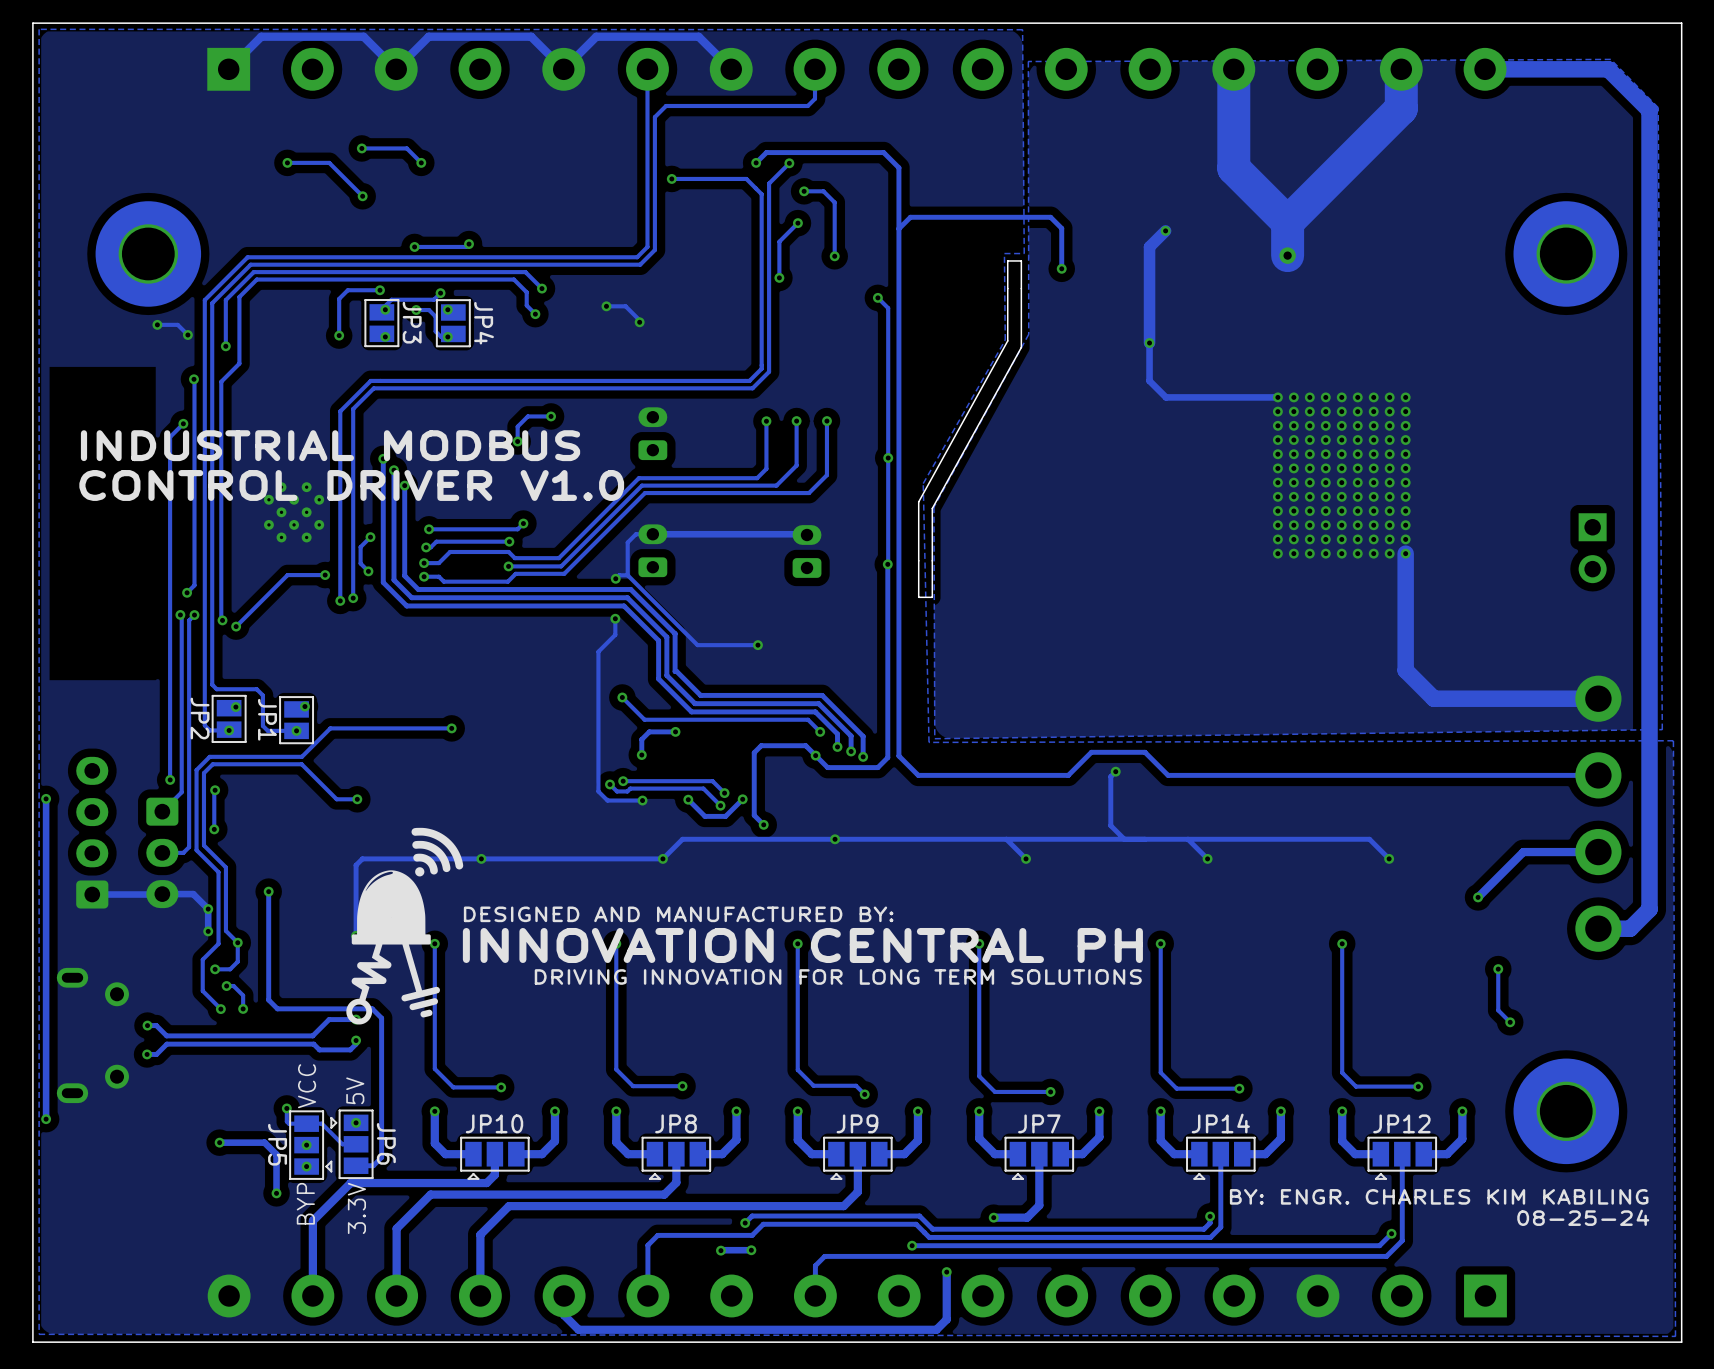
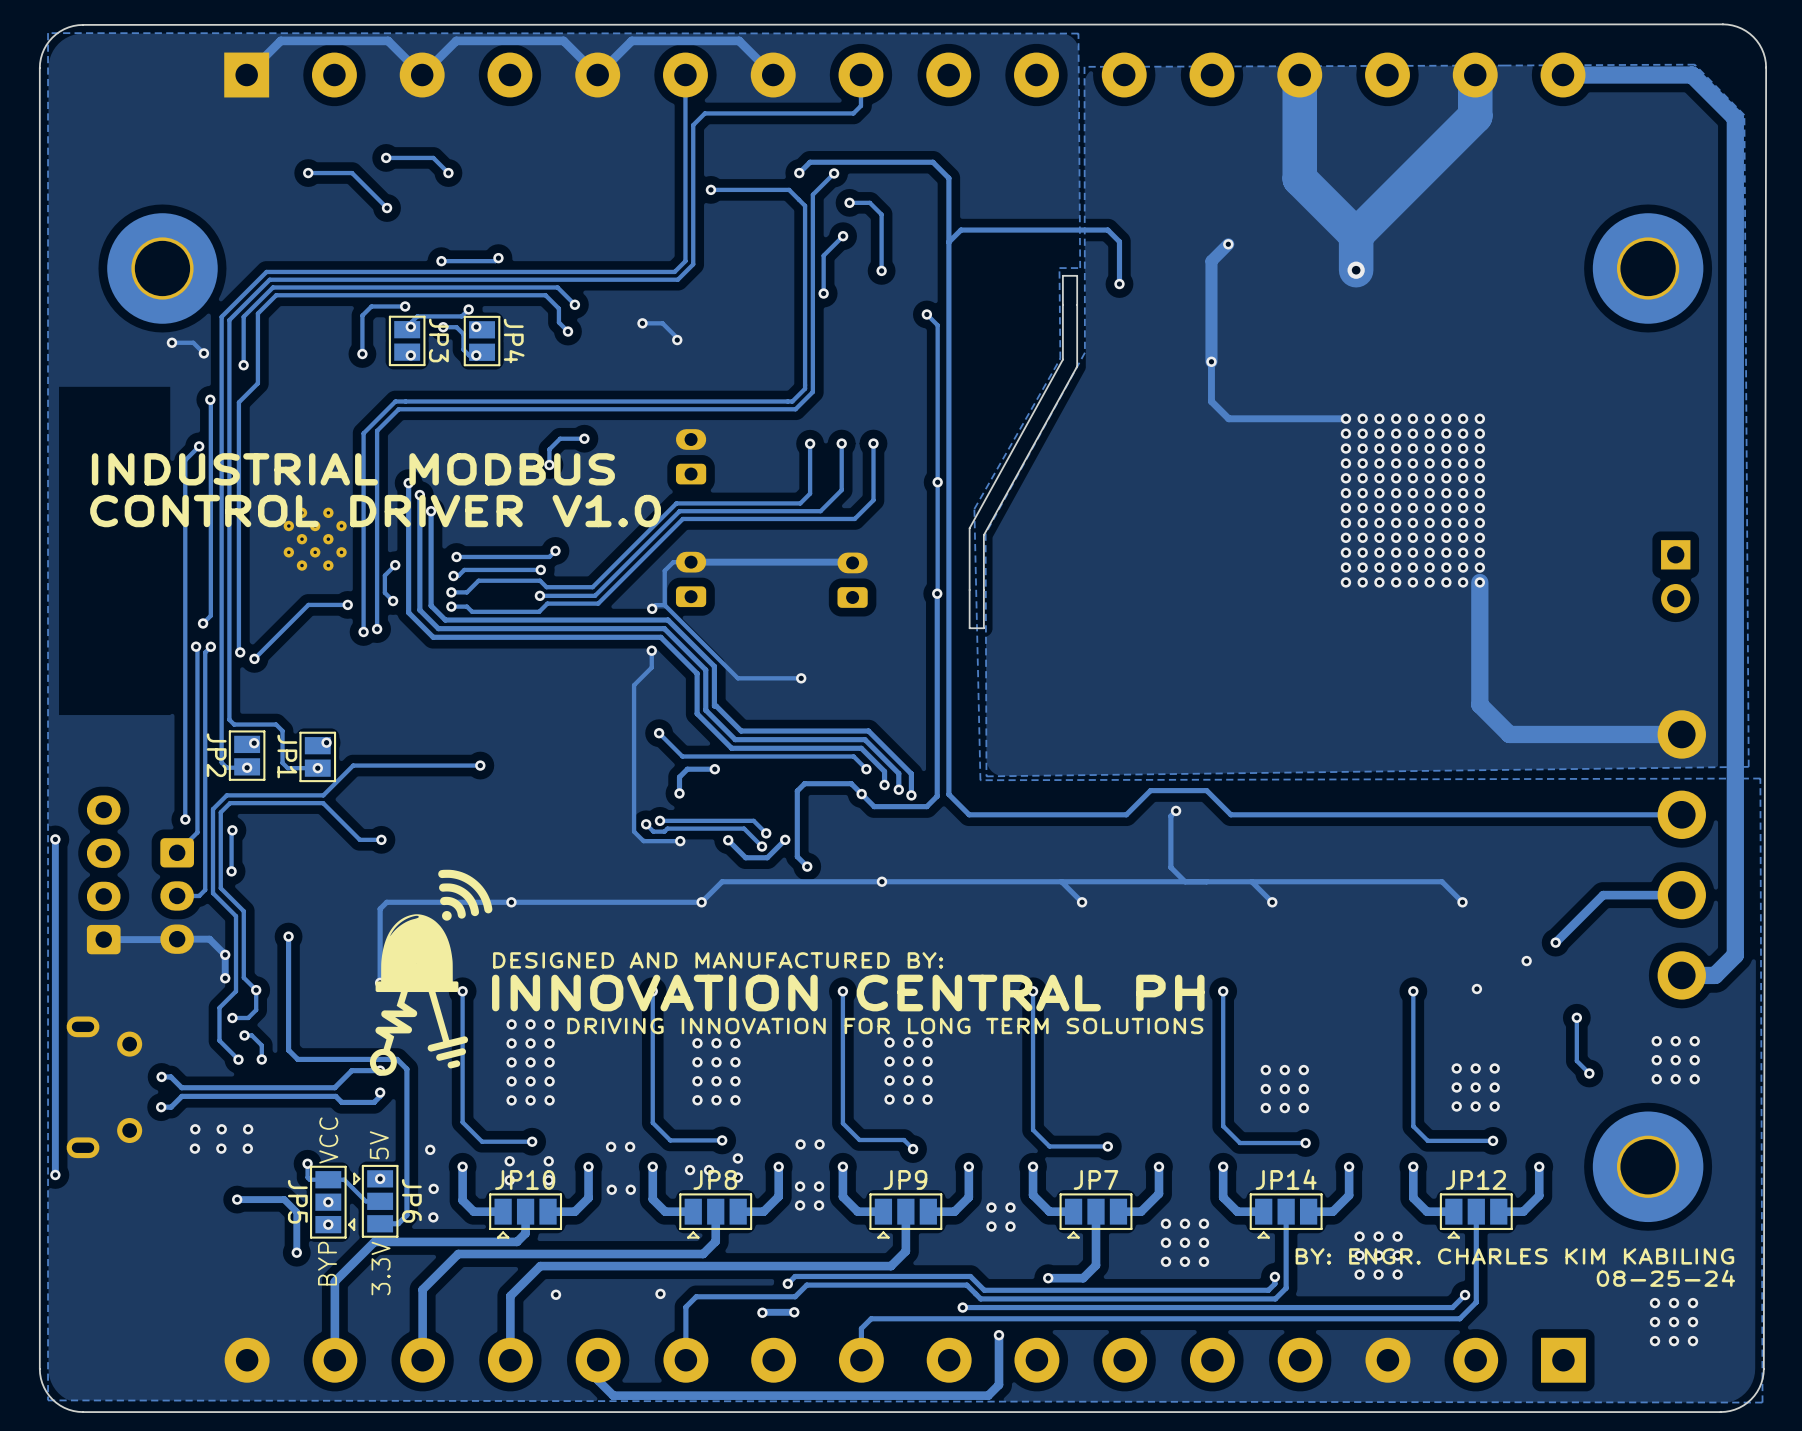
board edge: (1681, 23) (32, 23) (32, 1342) (1681, 1342) (1681, 23) -> (1722, 24) (1737, 26) (1753, 37) (1761, 48) (1766, 67) (1763, 1368) (1759, 1387) (1747, 1402) (1734, 1409) (1720, 1412) (83, 1412) (64, 1407) (49, 1395) (42, 1383) (39, 1368) (39, 68) (44, 49) (56, 34) (68, 27) (83, 24) (1722, 24)
via: none -> (1526, 961)
via: none -> (1476, 989)
via: none -> (511, 1024)
via: none -> (530, 1024)
via: none -> (549, 1024)
via: none -> (1656, 1041)
via: none -> (1675, 1041)
via: none -> (1694, 1041)
via: none -> (889, 1042)
via: none -> (908, 1042)
via: none -> (927, 1042)
via: none -> (511, 1043)
via: none -> (530, 1043)
via: none -> (549, 1043)
via: none -> (697, 1043)
via: none -> (716, 1043)
via: none -> (735, 1043)
via: none -> (1656, 1060)
via: none -> (1675, 1060)
via: none -> (1694, 1060)
via: none -> (889, 1061)
via: none -> (908, 1061)
via: none -> (927, 1061)
via: none -> (511, 1062)
via: none -> (530, 1062)
via: none -> (549, 1062)
via: none -> (697, 1062)
via: none -> (716, 1062)
via: none -> (735, 1062)
via: none -> (1456, 1068)
via: none -> (1475, 1068)
via: none -> (1494, 1068)
via: none -> (1265, 1070)
via: none -> (1284, 1070)
via: none -> (1303, 1070)
via: none -> (1656, 1079)
via: none -> (1675, 1079)
via: none -> (1694, 1079)
via: none -> (511, 1081)
via: none -> (530, 1081)
via: none -> (549, 1081)
via: none -> (697, 1081)
via: none -> (716, 1081)
via: none -> (735, 1081)
via: none -> (889, 1080)
via: none -> (908, 1080)
via: none -> (927, 1080)
via: none -> (1456, 1087)
via: none -> (1475, 1087)
via: none -> (1494, 1087)
via: none -> (1265, 1089)
via: none -> (1284, 1089)
via: none -> (1303, 1089)
via: none -> (697, 1100)
via: none -> (716, 1100)
via: none -> (735, 1100)
via: none -> (889, 1099)
via: none -> (908, 1099)
via: none -> (927, 1099)
via: none -> (511, 1100)
via: none -> (530, 1100)
via: none -> (549, 1100)
via: none -> (1456, 1106)
via: none -> (1475, 1106)
via: none -> (1494, 1106)
via: none -> (1265, 1108)
via: none -> (1284, 1108)
via: none -> (1303, 1108)
via: none -> (195, 1129)
via: none -> (221, 1129)
via: none -> (248, 1129)
via: none -> (800, 1144)
via: none -> (819, 1144)
via: none -> (611, 1146)
via: none -> (630, 1146)
via: none -> (194, 1148)
via: none -> (221, 1148)
via: none -> (247, 1148)
via: none -> (430, 1149)
via: none -> (737, 1158)
via: none -> (509, 1161)
via: none -> (548, 1161)
via: none -> (690, 1170)
via: none -> (709, 1170)
via: none -> (737, 1177)
via: none -> (509, 1180)
via: none -> (548, 1180)
via: none -> (800, 1186)
via: none -> (819, 1186)
via: none -> (433, 1188)
via: none -> (611, 1189)
via: none -> (630, 1189)
via: none -> (800, 1205)
via: none -> (819, 1205)
via: none -> (991, 1207)
via: none -> (1010, 1207)
via: none -> (433, 1217)
via: none -> (1165, 1223)
via: none -> (1184, 1223)
via: none -> (1203, 1223)
via: none -> (991, 1226)
via: none -> (1010, 1226)
via: none -> (1359, 1236)
via: none -> (1378, 1236)
via: none -> (1397, 1236)
via: none -> (1165, 1242)
via: none -> (1184, 1242)
via: none -> (1203, 1242)
via: none -> (1359, 1255)
via: none -> (1378, 1255)
via: none -> (1397, 1255)
via: none -> (1165, 1261)
via: none -> (1184, 1261)
via: none -> (1203, 1261)
via: none -> (1359, 1274)
via: none -> (1378, 1274)
via: none -> (1397, 1274)
via: none -> (660, 1293)
via: none -> (555, 1294)
via: none -> (1655, 1303)
via: none -> (1674, 1303)
via: none -> (1693, 1303)
via: none -> (1655, 1322)
via: none -> (1674, 1322)
via: none -> (1693, 1322)
via: none -> (1655, 1341)
via: none -> (1674, 1341)
via: none -> (1693, 1341)

